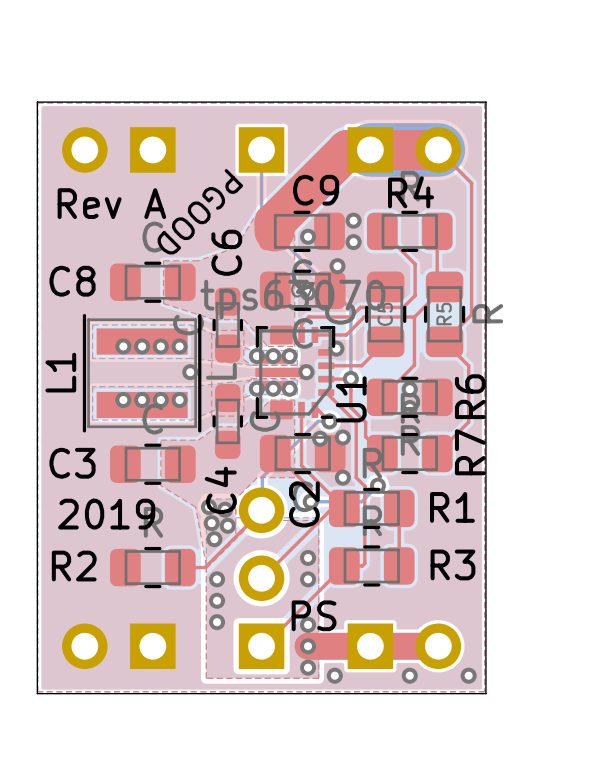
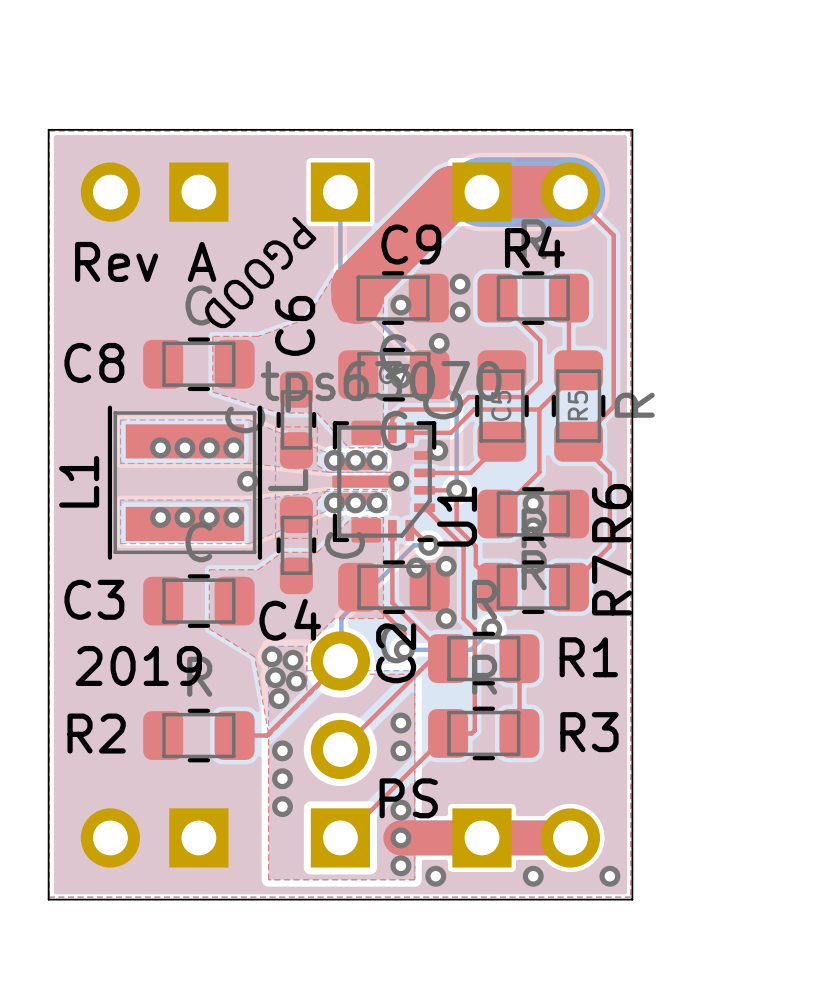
C4 name rotation: 0° (220, 490) -> 90° clockwise (290, 619)

